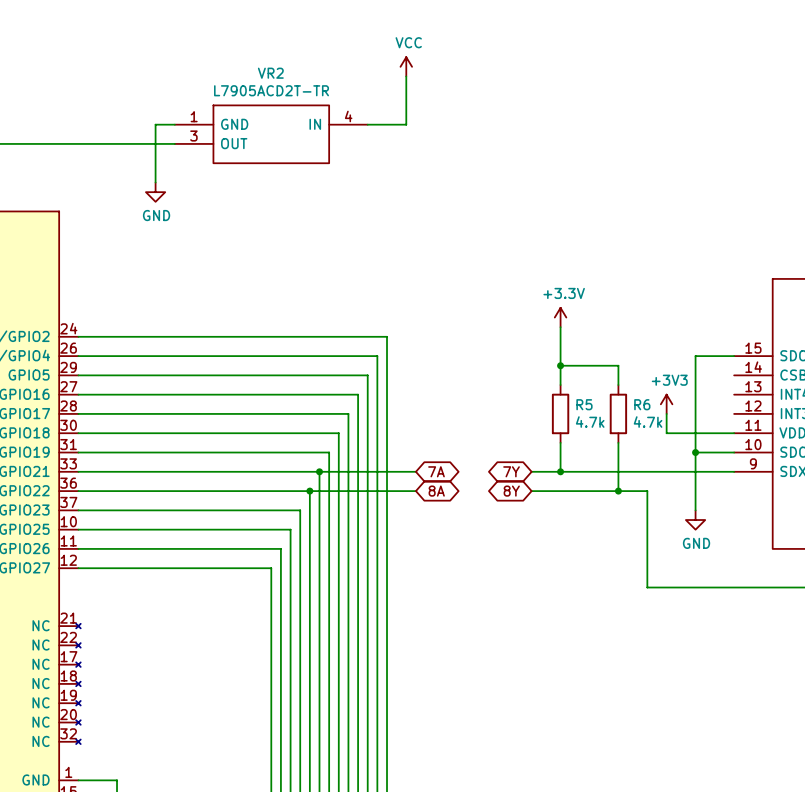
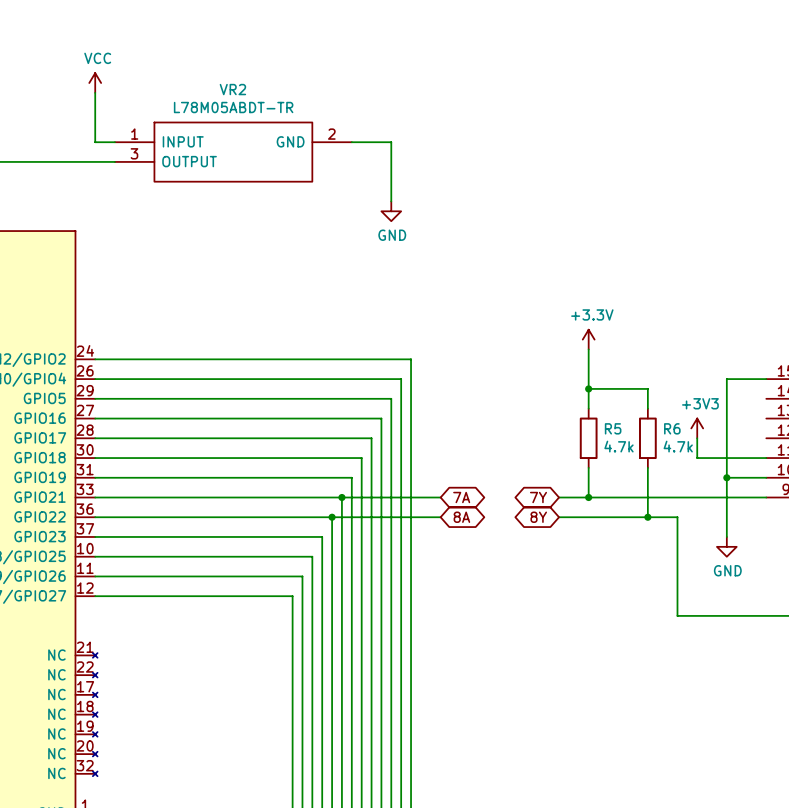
power symbol: none -> VCC (95, 83)
power symbol: VCC (406, 66) -> none
wire: none -> (95, 92) (95, 142) (114, 142)
wire: (406, 76) (406, 124) (367, 124) -> none
VR2 value: L7905ACD2T-TR (271, 90) -> L78M05ABDT-TR (233, 107)
VR2 symbol: [174, 104, 368, 164] -> [114, 121, 352, 183]
wire: (174, 124) (155, 124) (155, 182) -> none
wire: none -> (351, 142) (391, 142) (391, 201)
power symbol: GND (155, 192) -> none
power symbol: none -> GND (391, 211)

